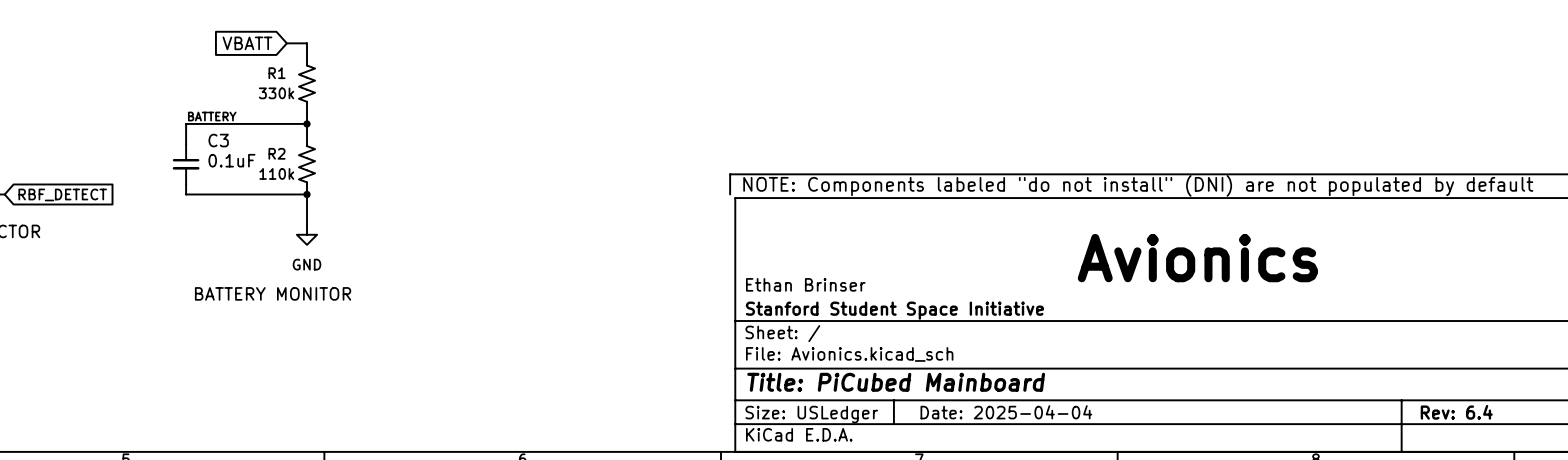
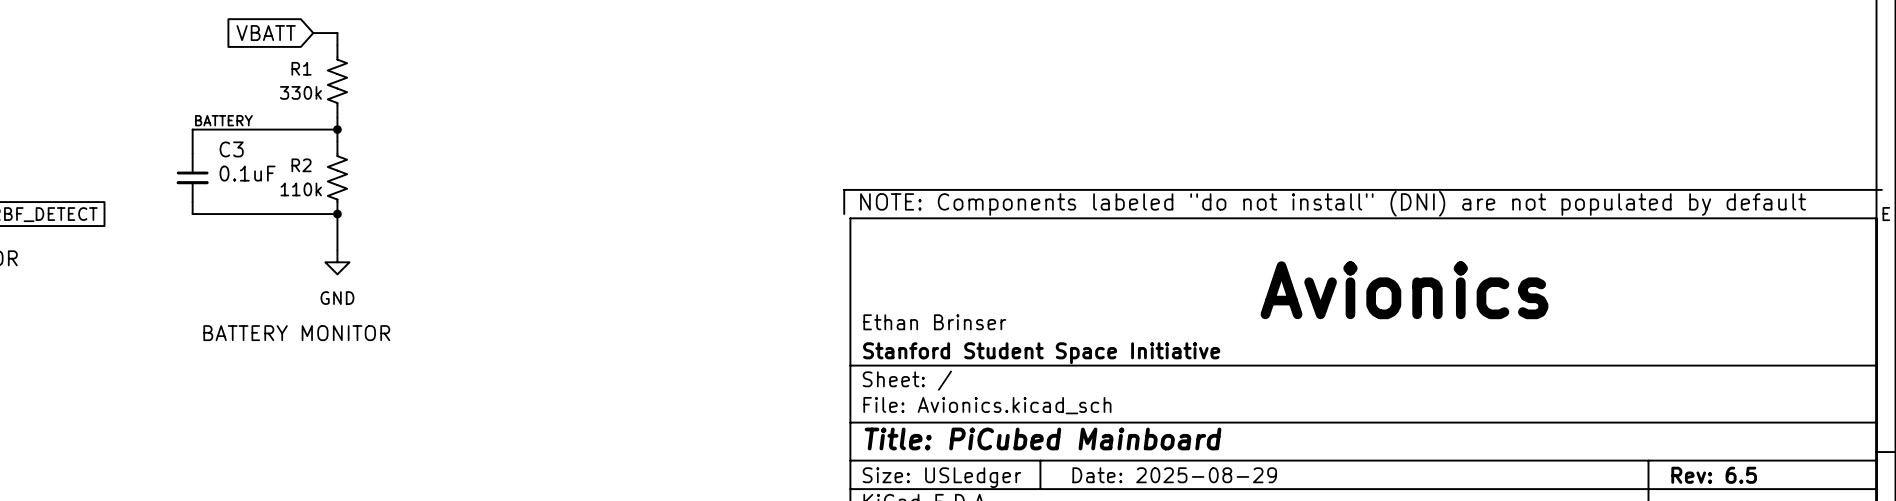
title block: Date: 2025-04-04 (1006, 412) -> Date: 2025-08-29 (1174, 475)
title block: Rev: 6.4 (1456, 412) -> Rev: 6.5 (1714, 475)

